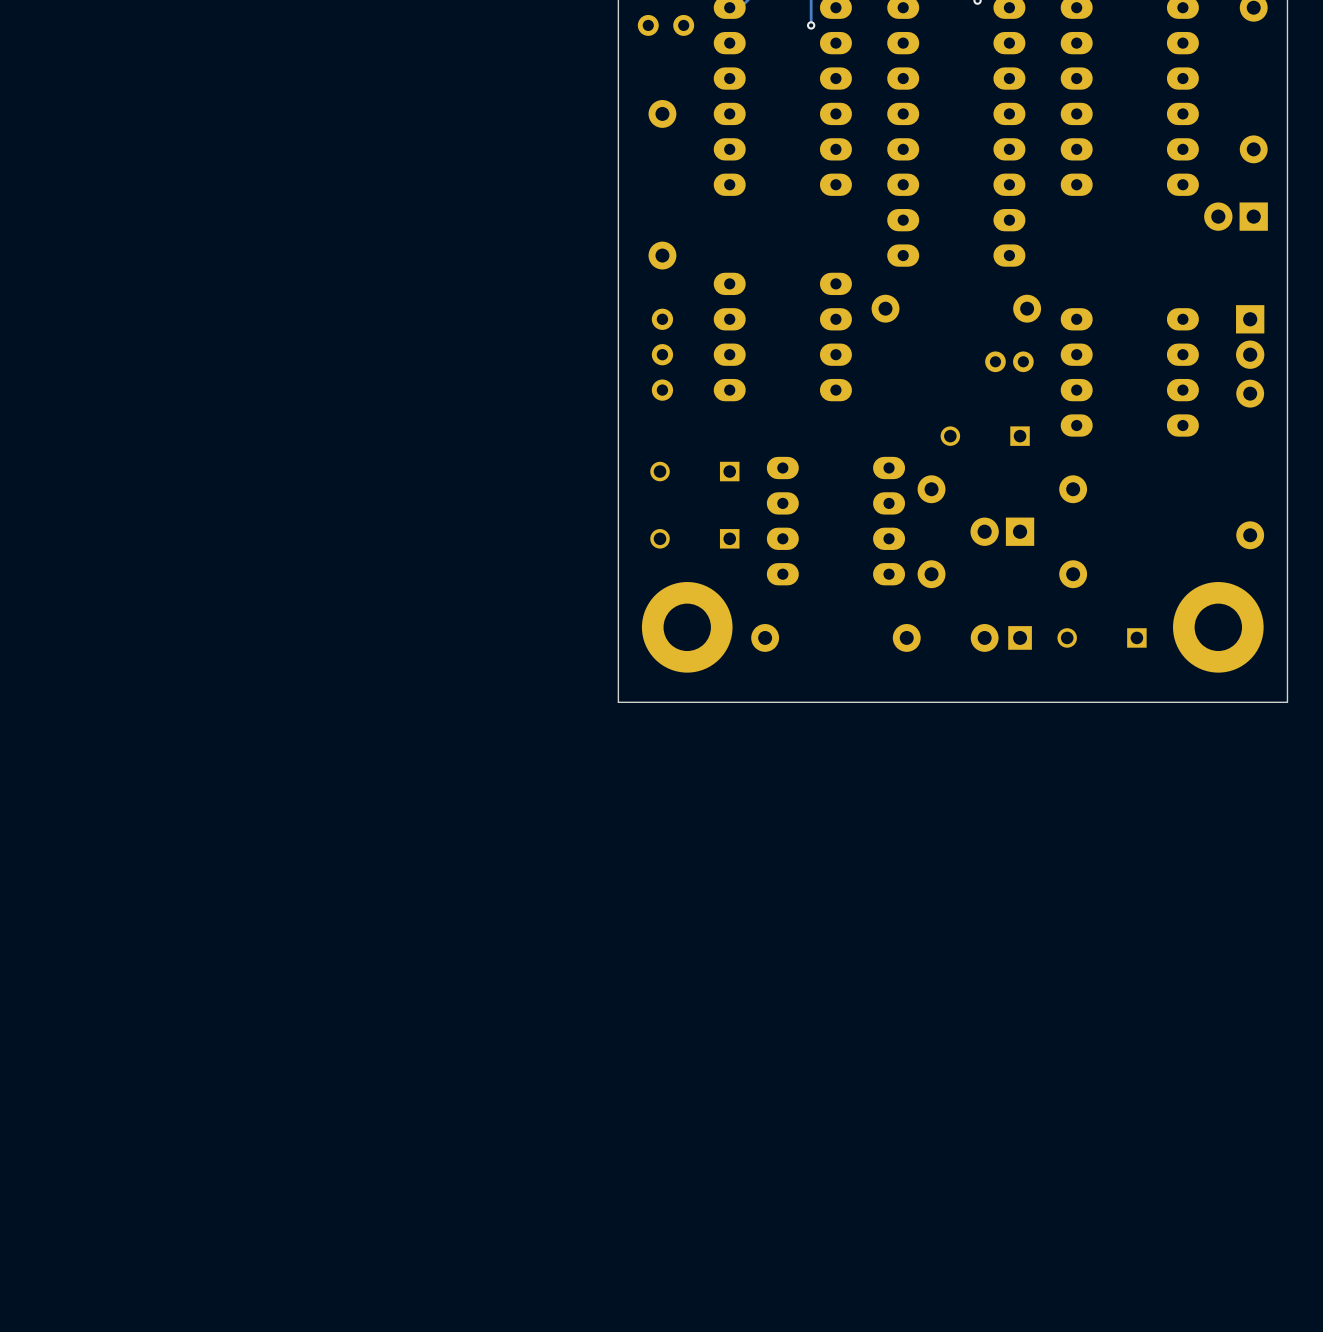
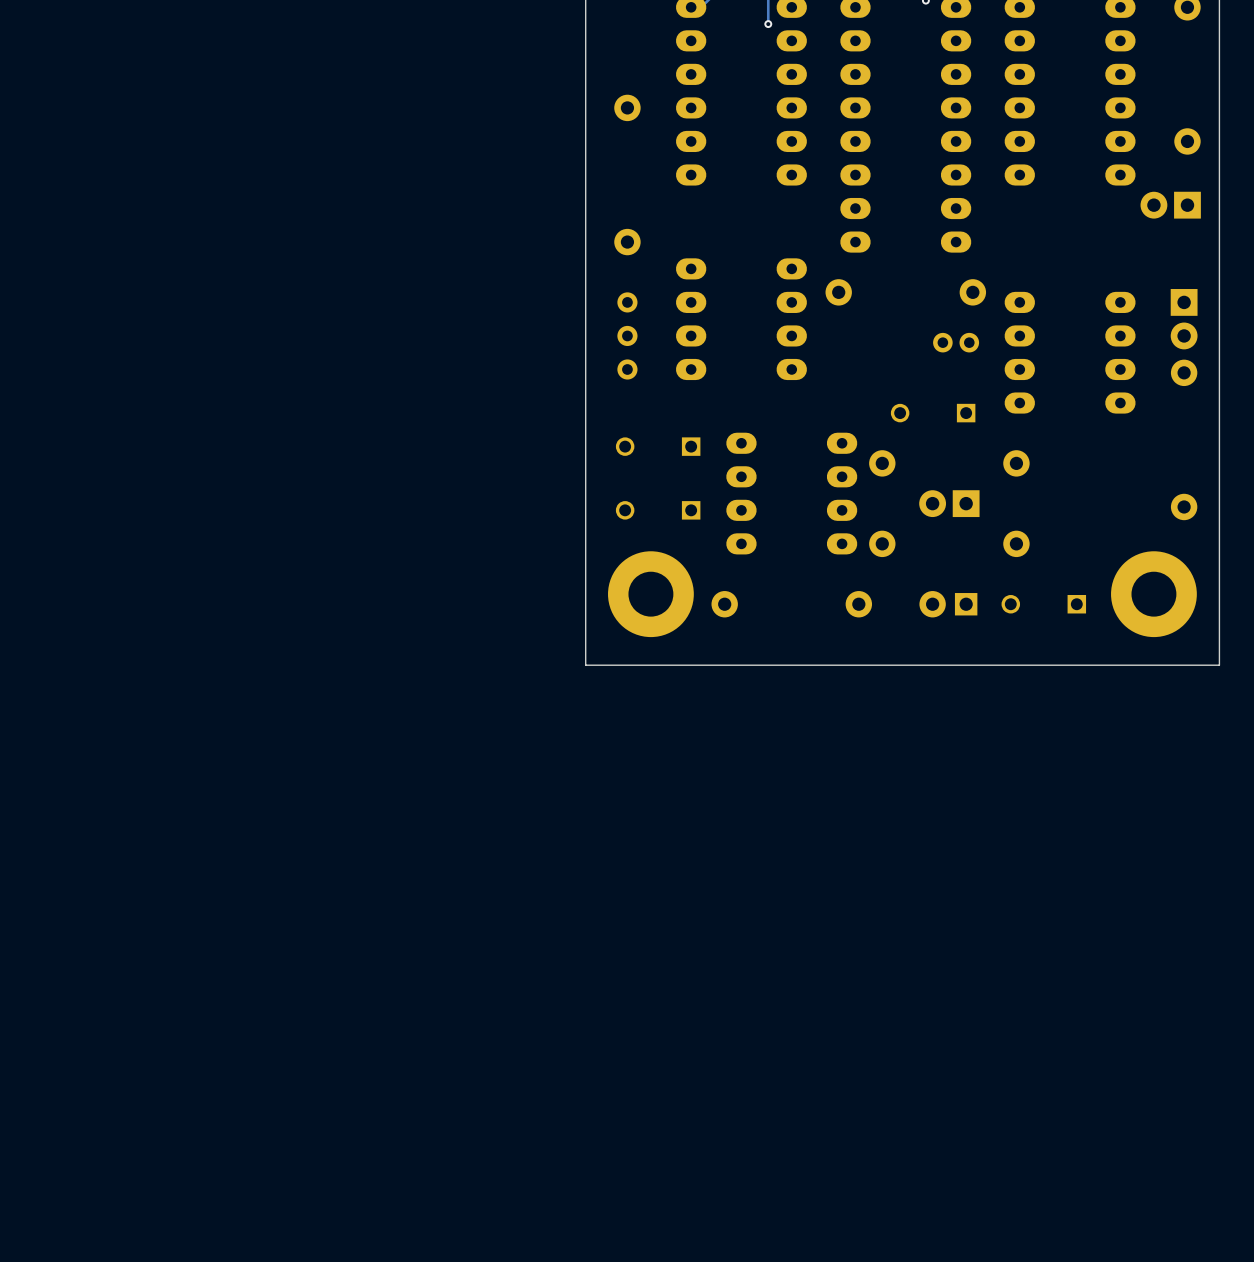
part: (665, 25) -> none

